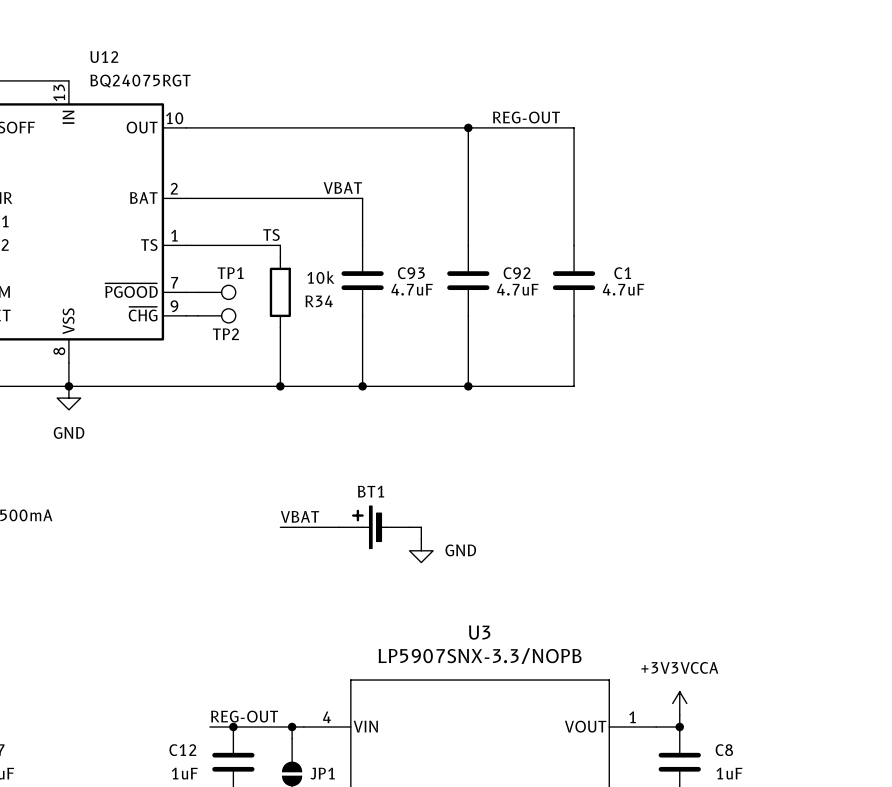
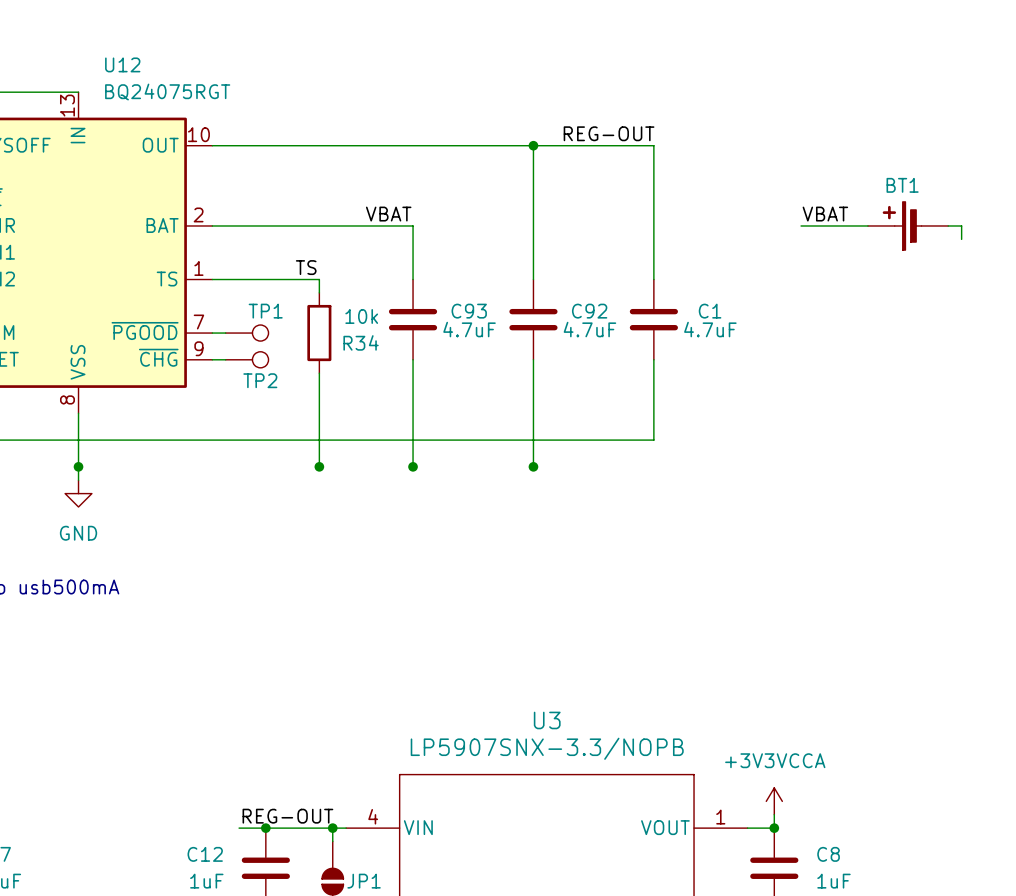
label: none -> VBAT (825, 214)
wire: none -> (801, 225) (867, 225)
wire: none -> (948, 225) (961, 225) (961, 239)
wire: none -> (78, 440) (78, 480)
junction position: (68, 386) -> (78, 466)
wire: none -> (319, 440) (319, 466)
junction position: (280, 386) -> (319, 466)
wire: none -> (413, 440) (413, 466)
junction position: (362, 386) -> (413, 466)
wire: none -> (533, 440) (533, 466)
junction position: (468, 386) -> (533, 466)
power symbol position: GND (68, 398) -> GND (78, 493)
label: VBAT (300, 516) -> none
wire: (280, 527) (339, 527) -> none
BT1 position: (374, 527) -> (908, 225)
wire: (409, 527) (421, 527) (421, 539) -> none
power symbol: GND (421, 550) -> none

